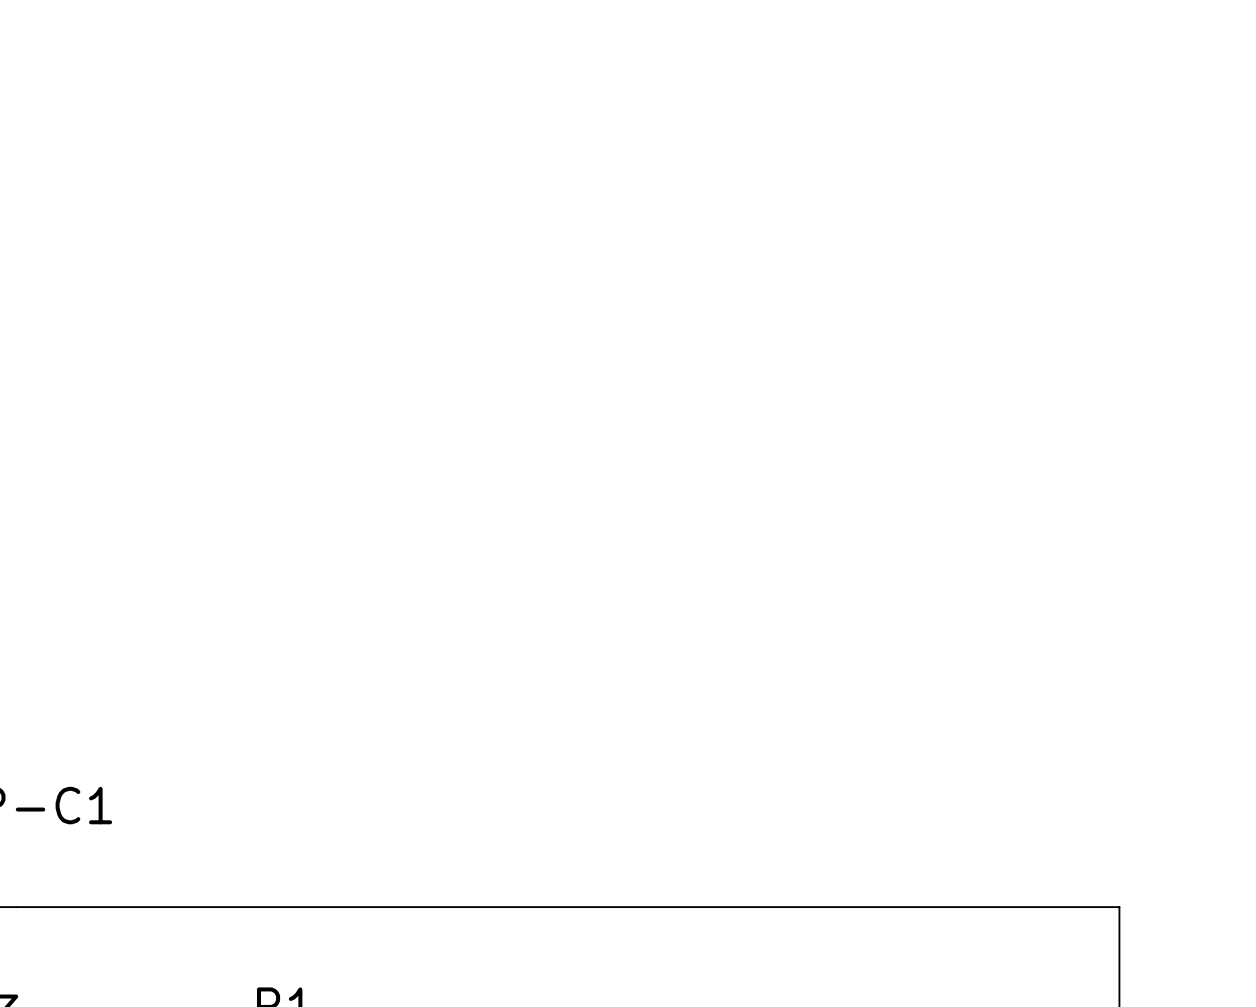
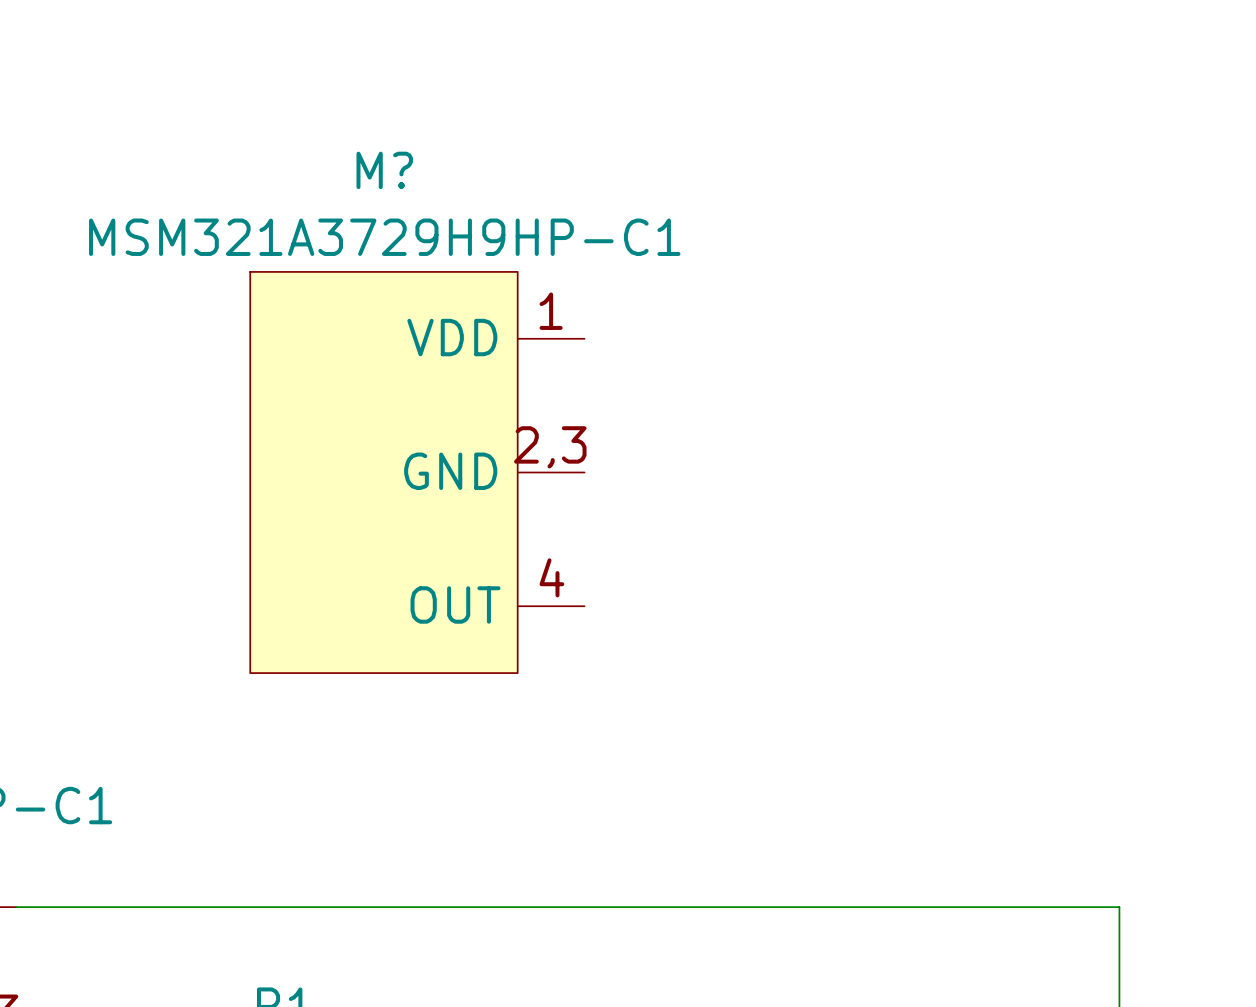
M?: none -> MSM321A3729H9HP-C1 (417, 472)

